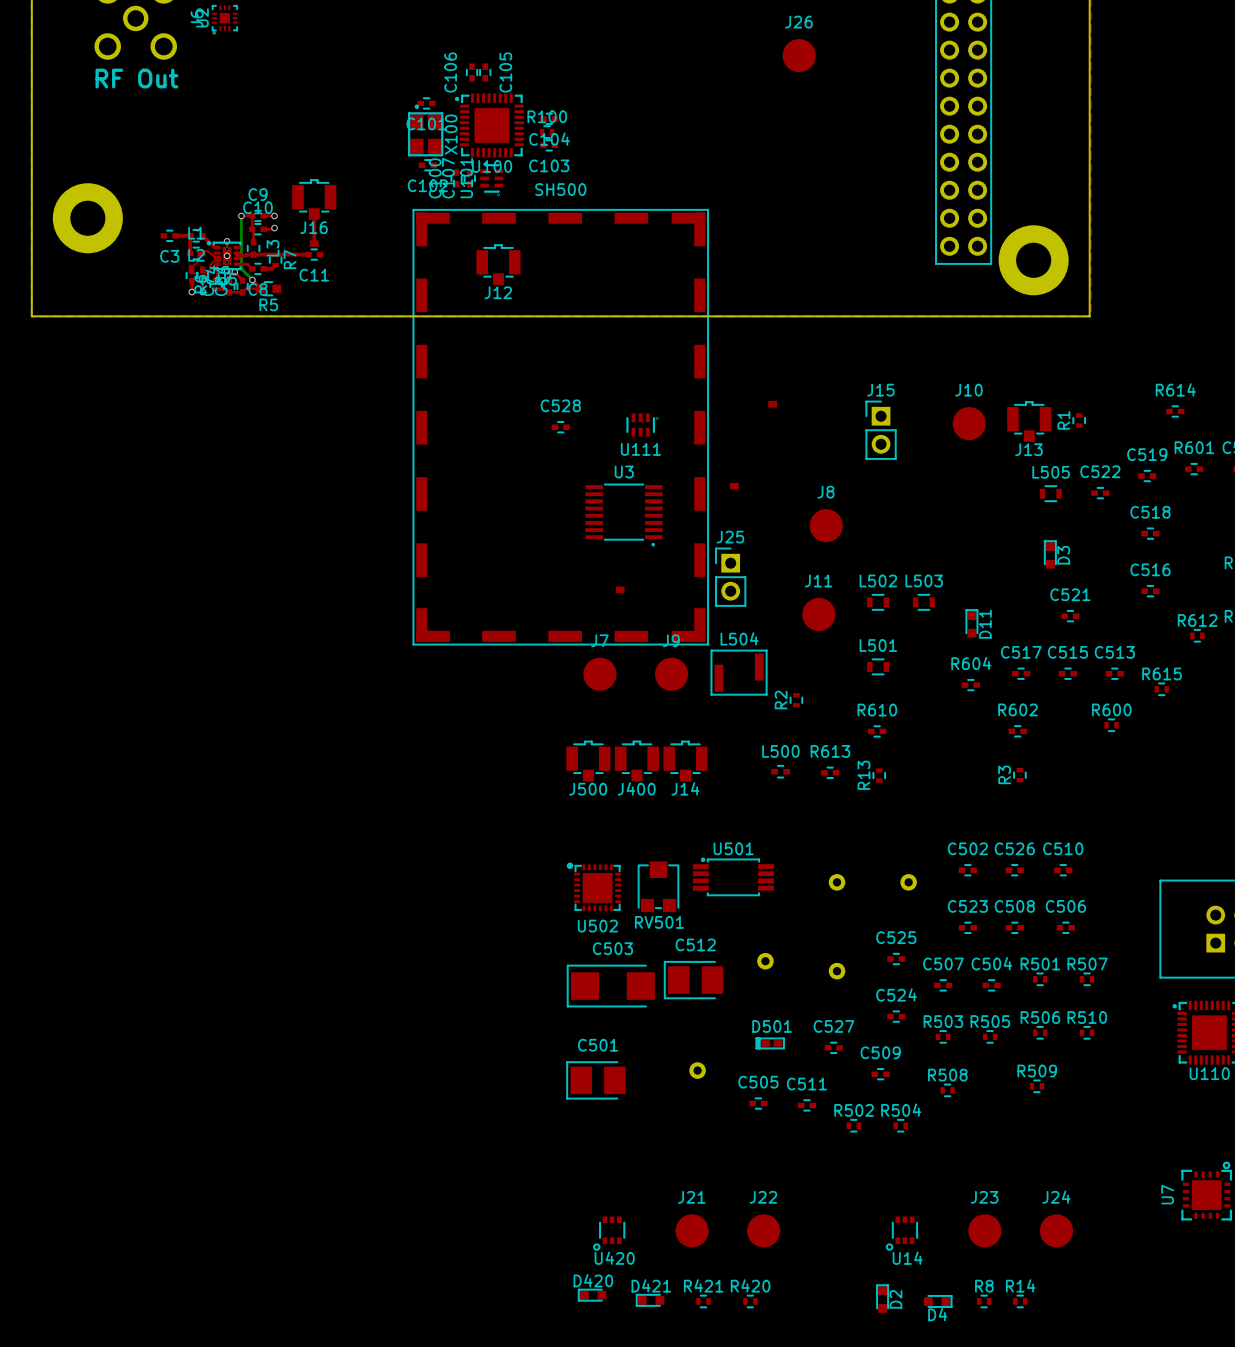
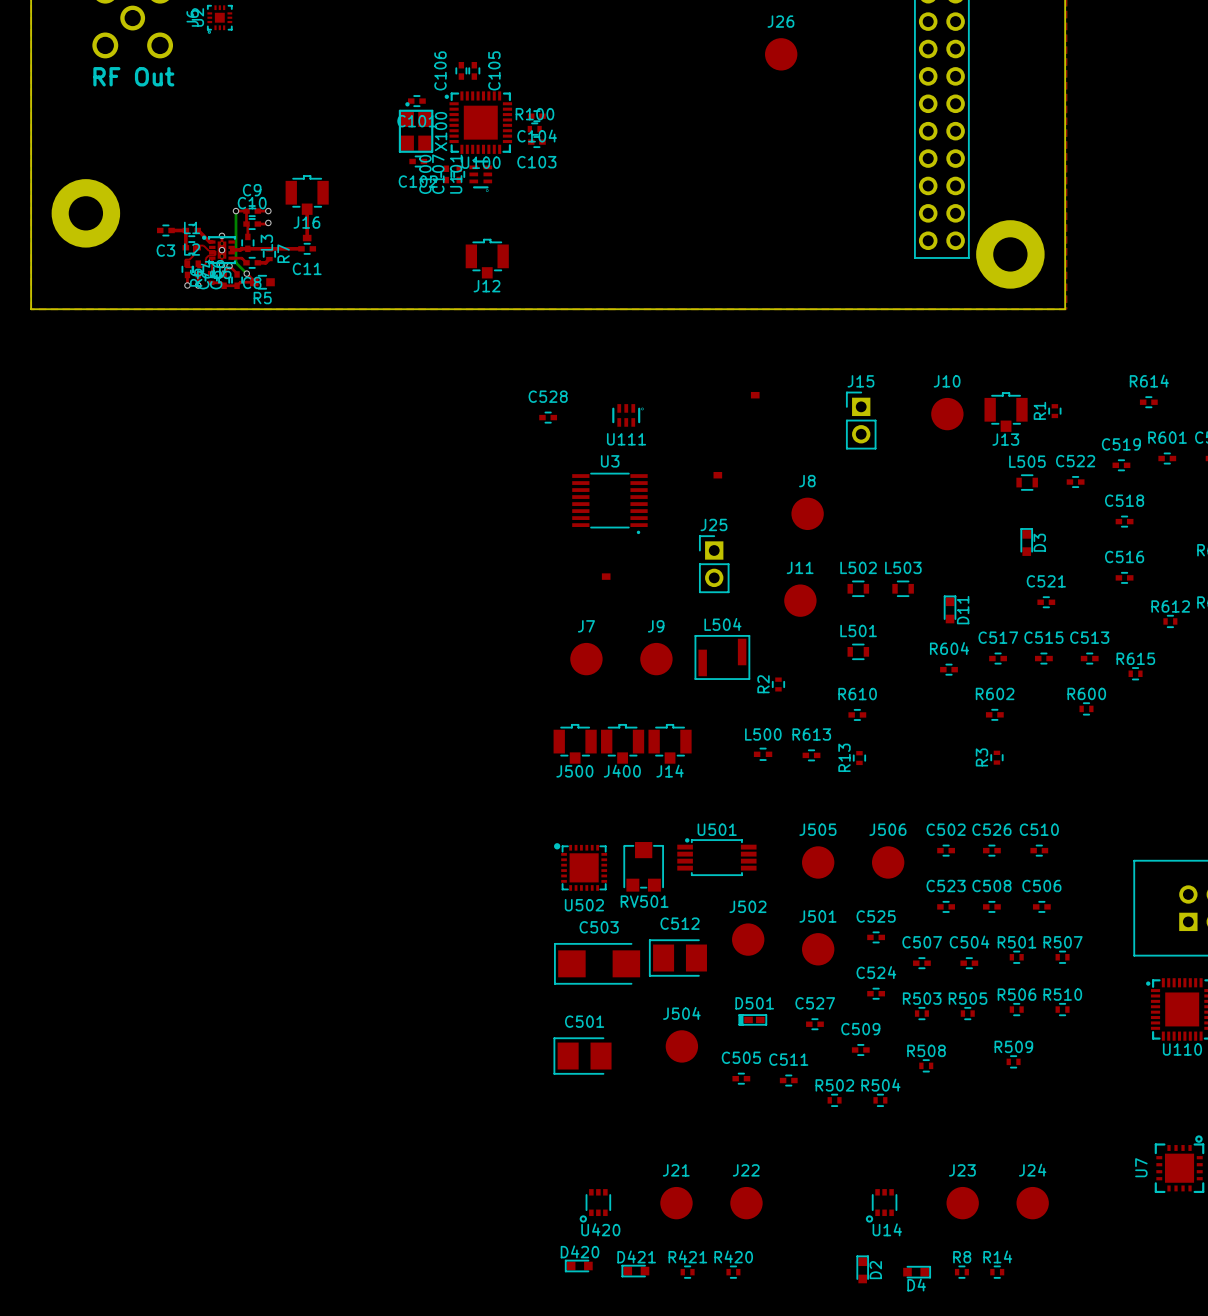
SH500: (560, 427) -> none
part: (837, 882) -> none
J505: none -> (818, 862)
part: (908, 882) -> none
J506: none -> (888, 862)
part: (765, 961) -> none
J502: none -> (748, 939)
part: (837, 971) -> none
J501: none -> (818, 949)
part: (697, 1070) -> none
J504: none -> (681, 1046)

